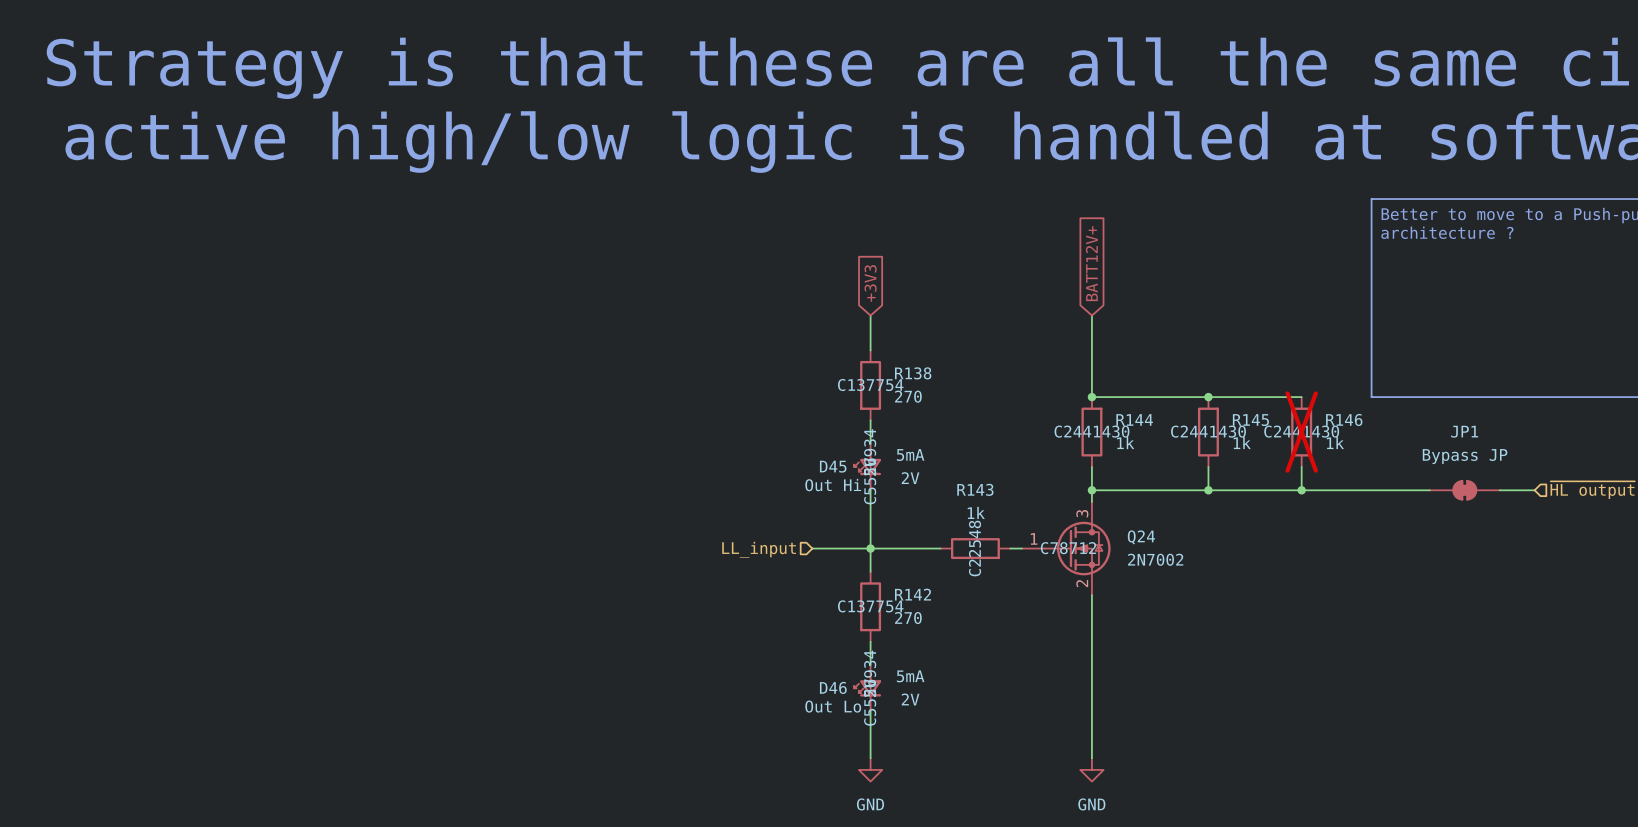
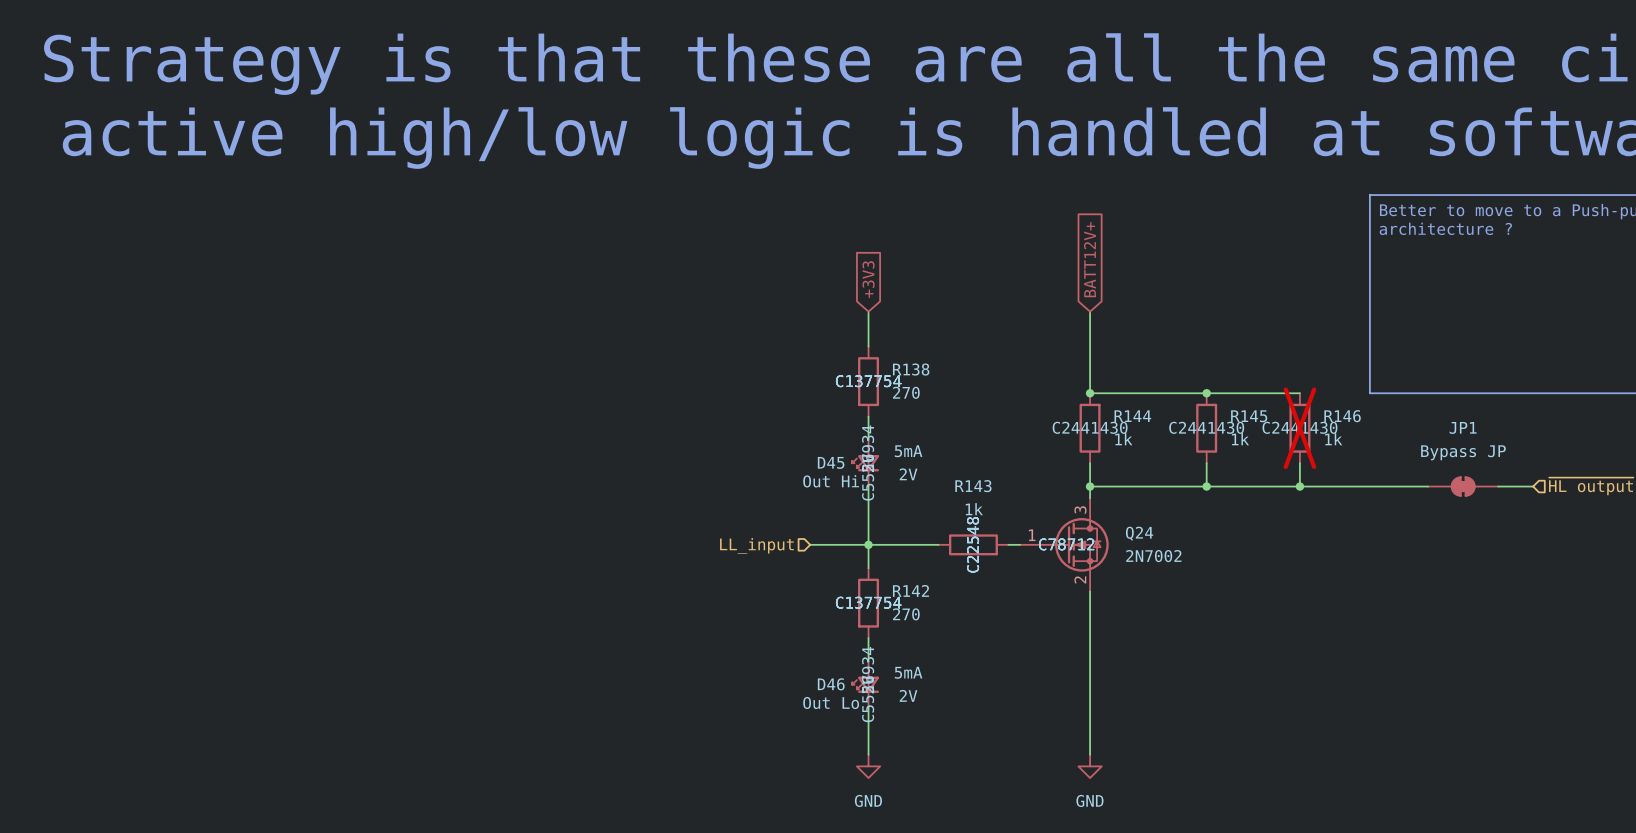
R138 text: none -> C137754 (868, 381)
R143 text: none -> C22548 (973, 544)
Q24 text: none -> C78712 (1066, 544)
R142 text: none -> C137754 (868, 602)

